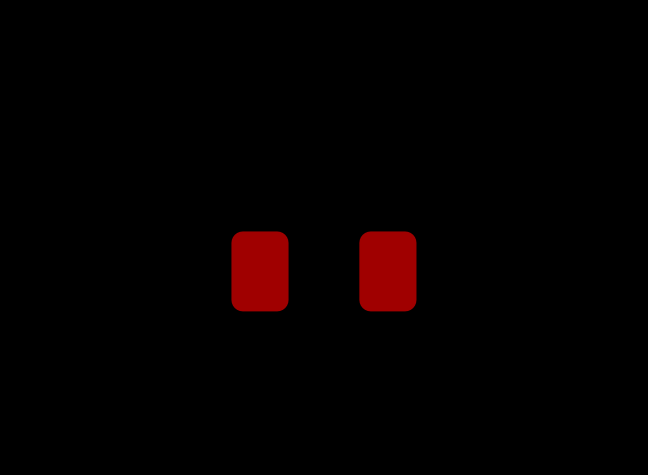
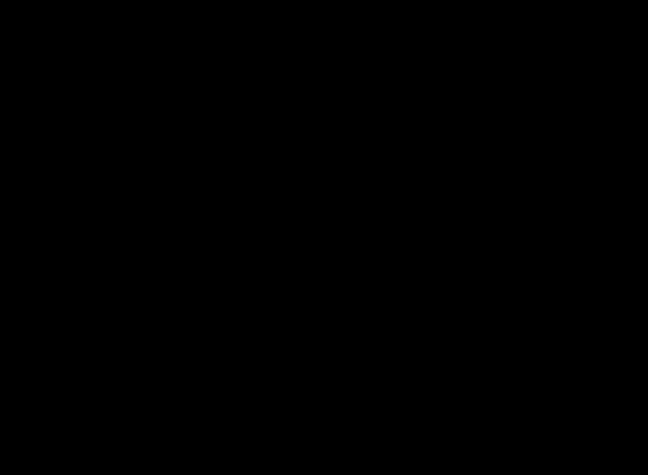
part: (323, 271) -> none

